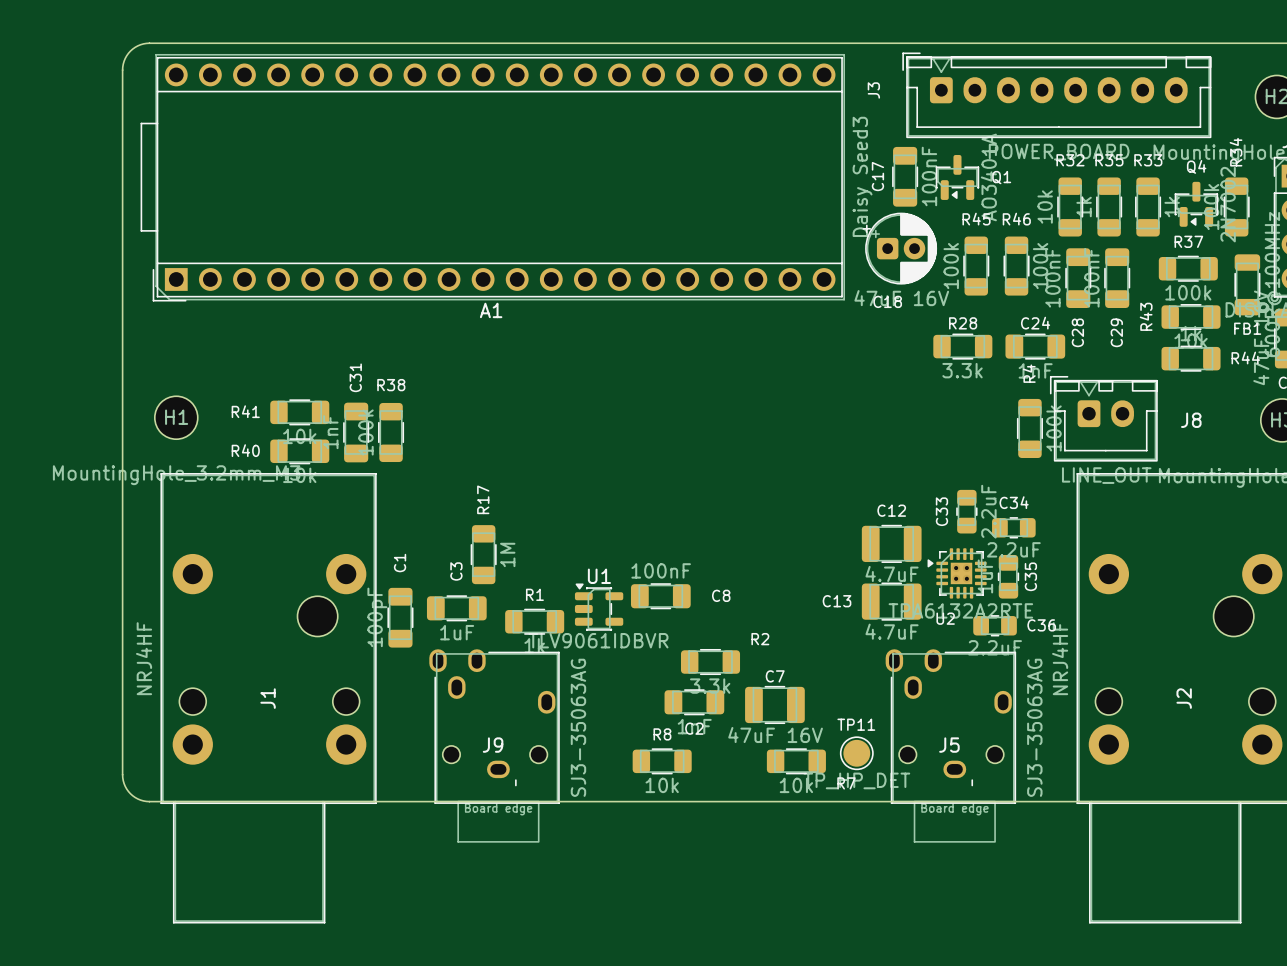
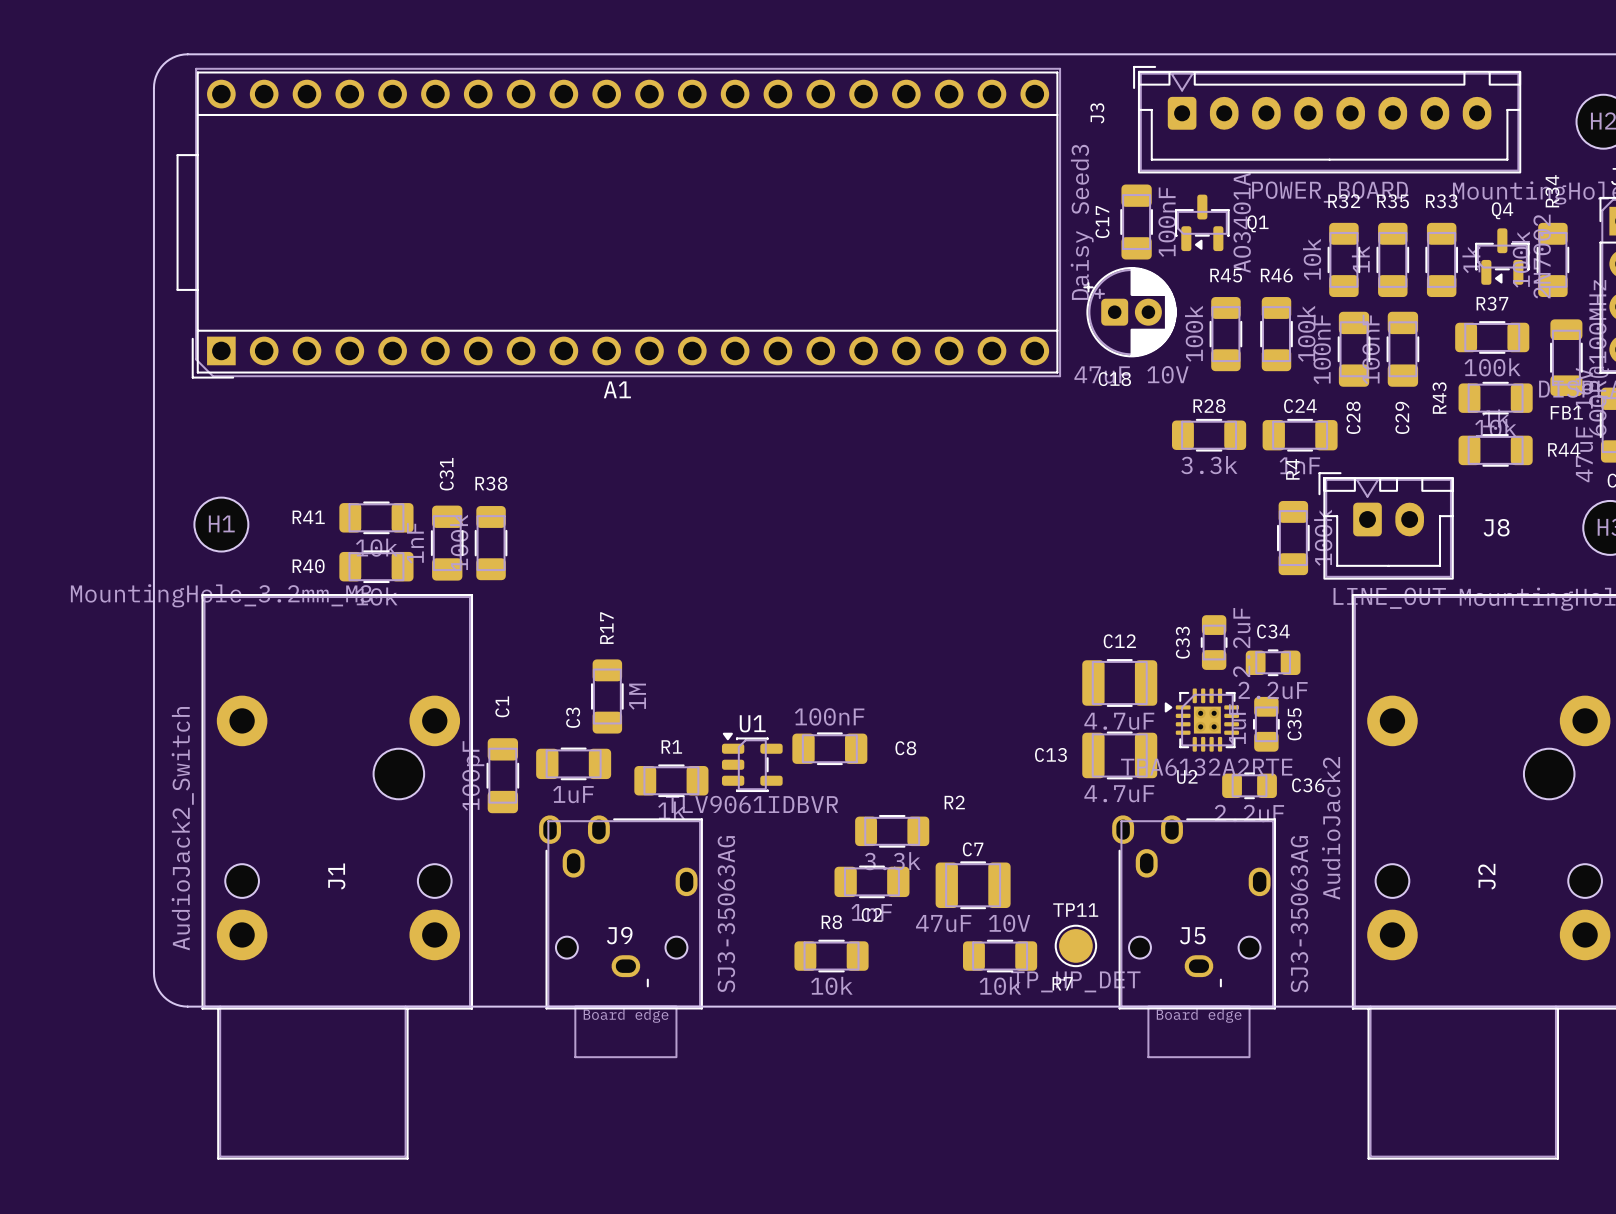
C18 value: 47uF 16V (901, 298) -> 47uF 10V (1131, 374)
J1 value: NRJ4HF (144, 658) -> AudioJack2_Switch (182, 828)
J2 value: NRJ4HF (1060, 658) -> AudioJack2 (1331, 828)
C7 value: 47uF 16V (775, 735) -> 47uF 10V (973, 923)

